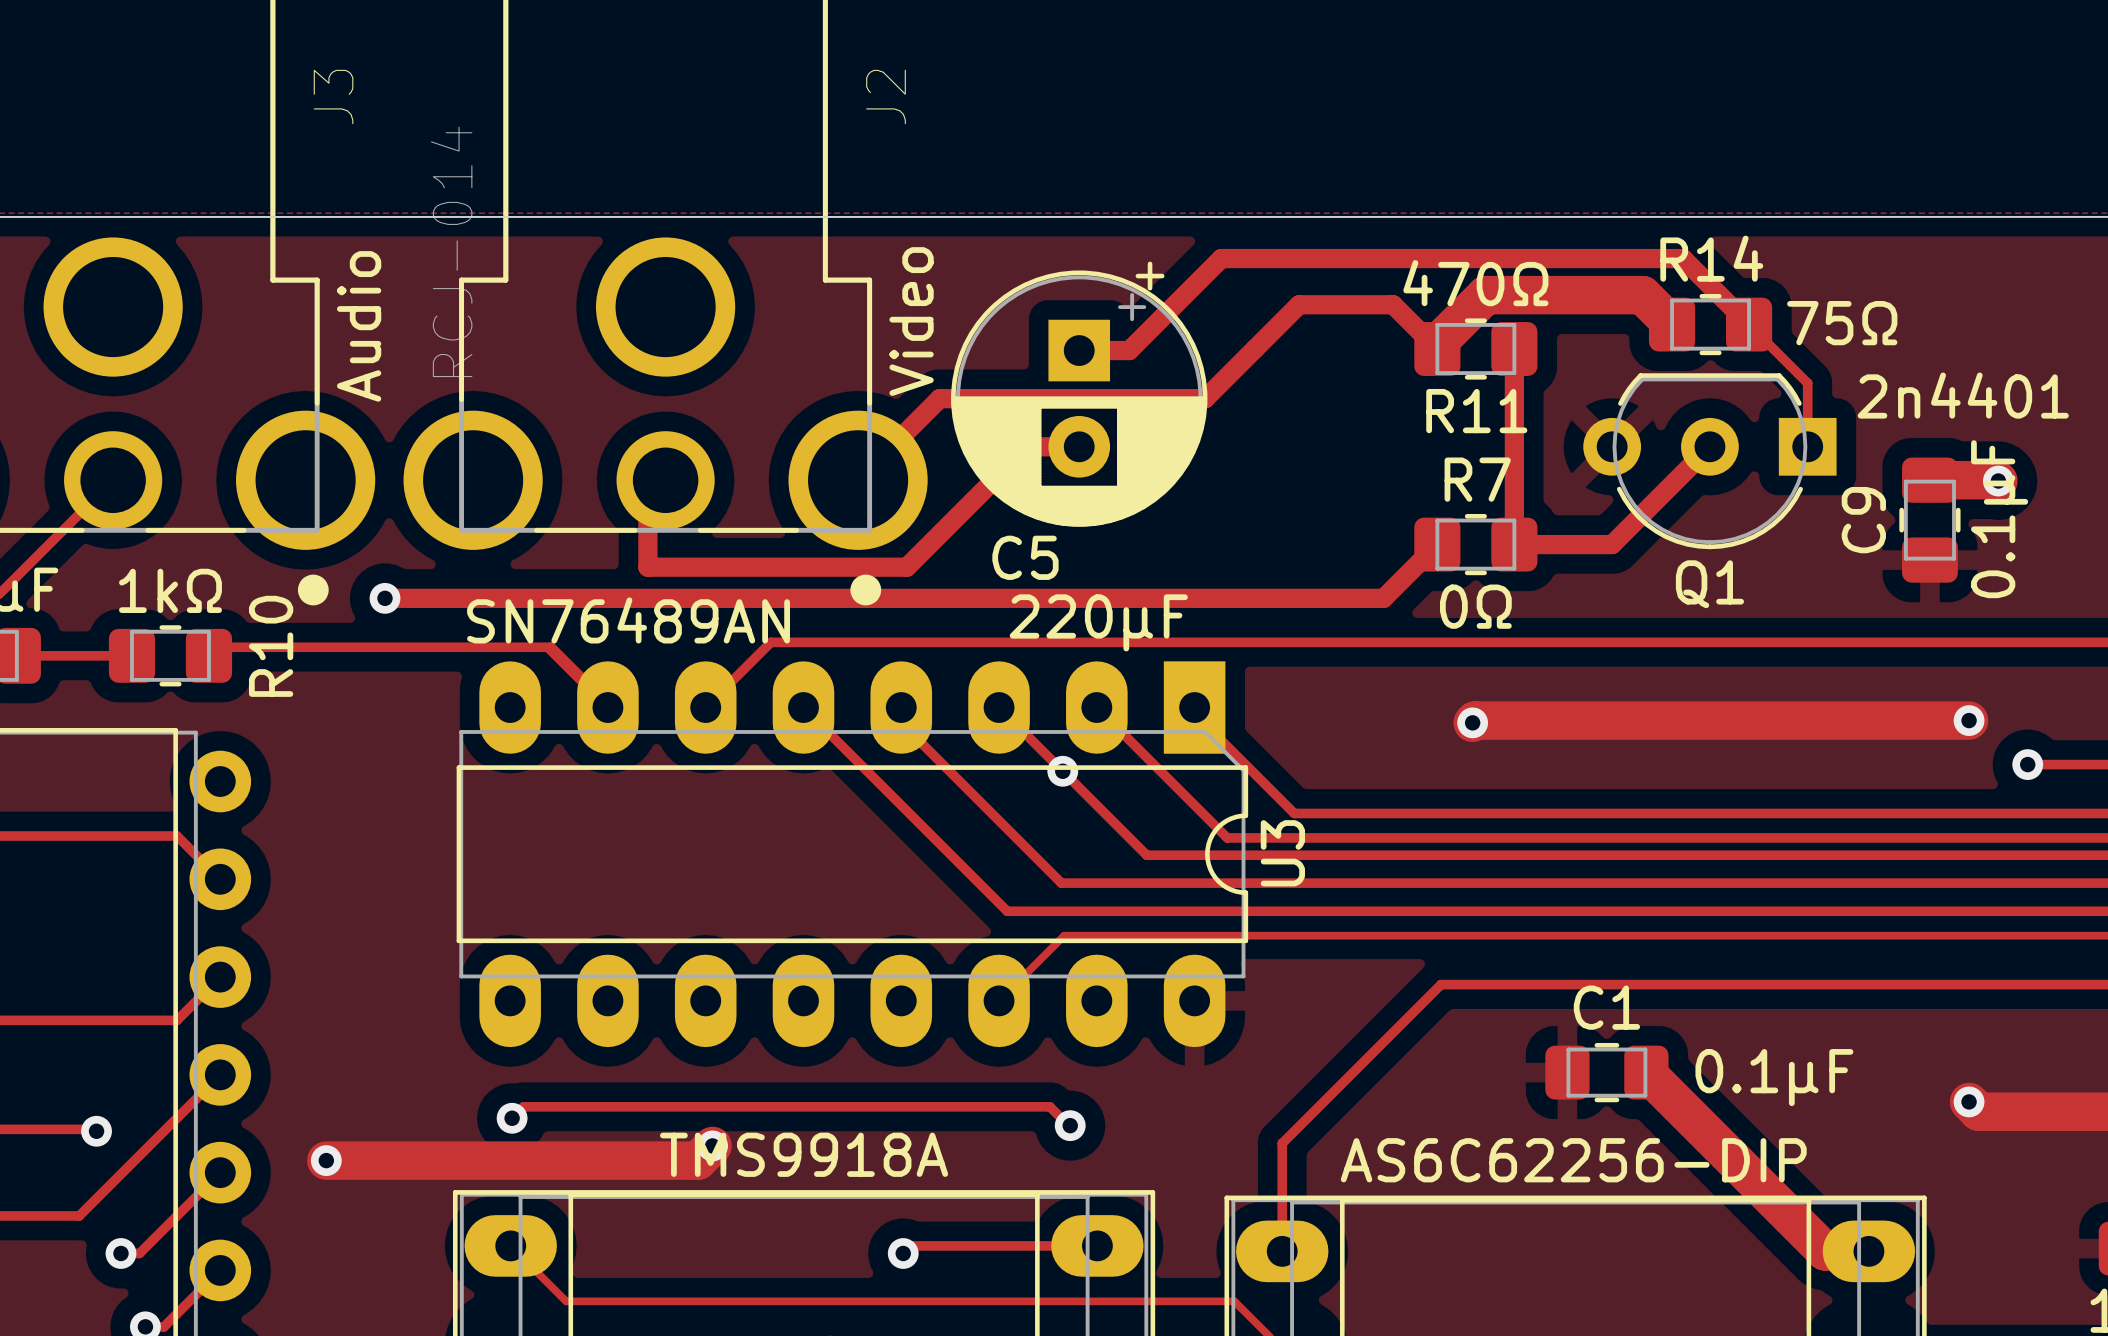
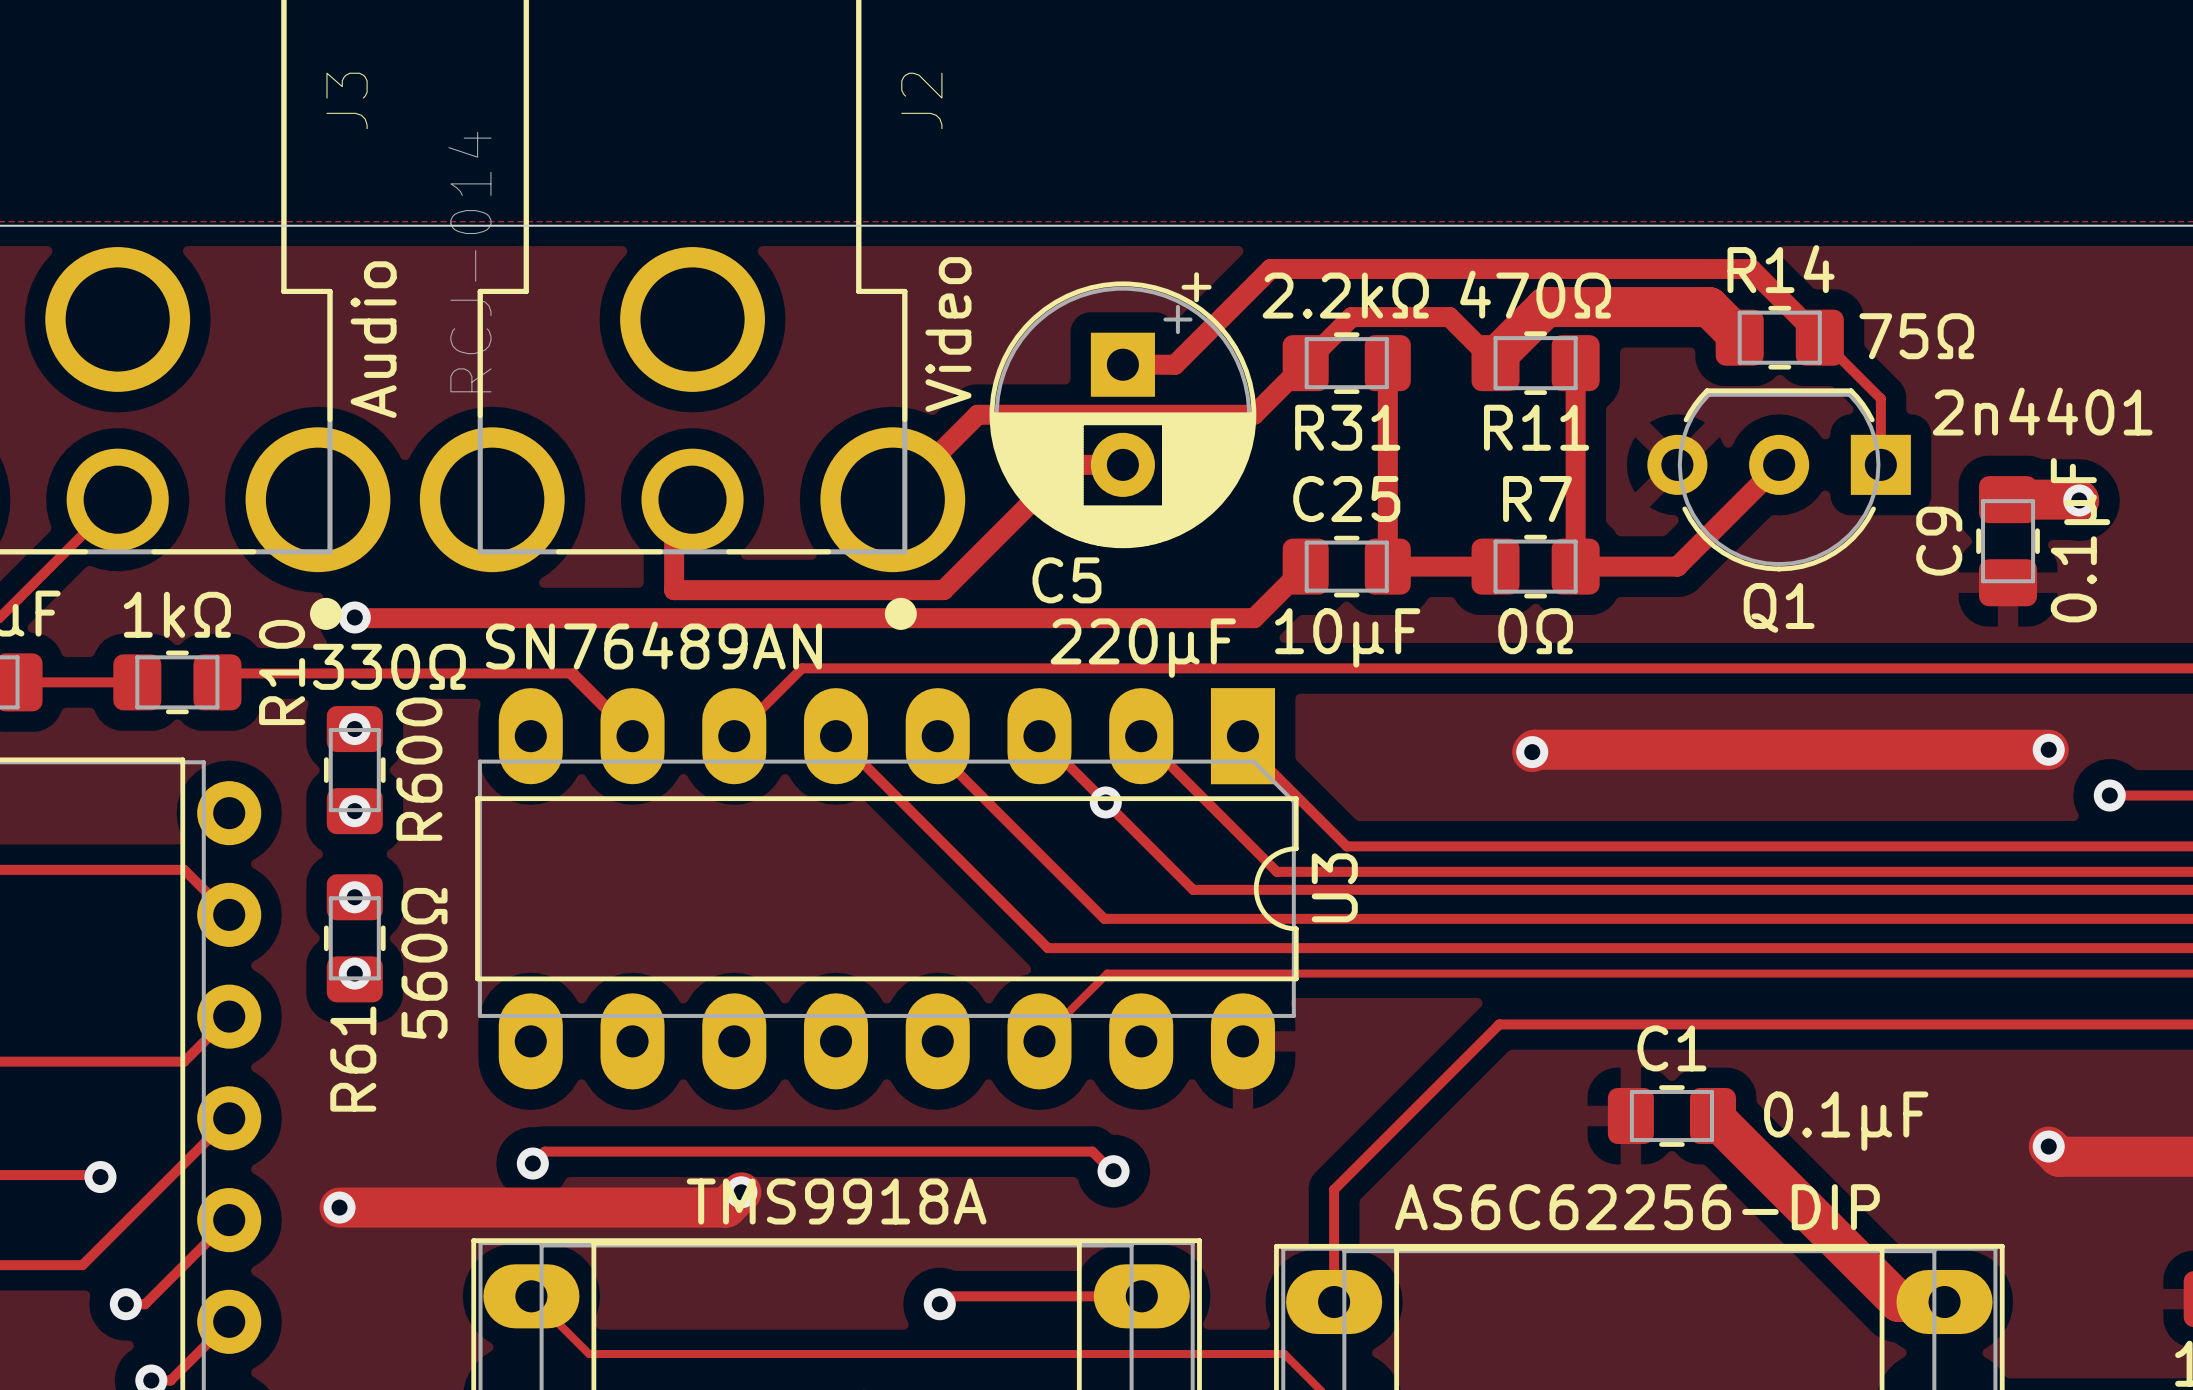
R31: none -> 2.2kΩ (1346, 363)
track: none -> (1305, 566) (1254, 618) (354, 617)
C25: none -> 10µF (1346, 566)
track: (1437, 544) (1383, 598) (384, 598) -> (1495, 566) (1387, 566) (1387, 363)
via position: (384, 598) -> (354, 617)
via: none -> (354, 729)
R600: none -> 330Ω (354, 770)
via: none -> (354, 811)
via: none -> (354, 897)
R61: none -> 560Ω (354, 938)
via: none -> (354, 973)

